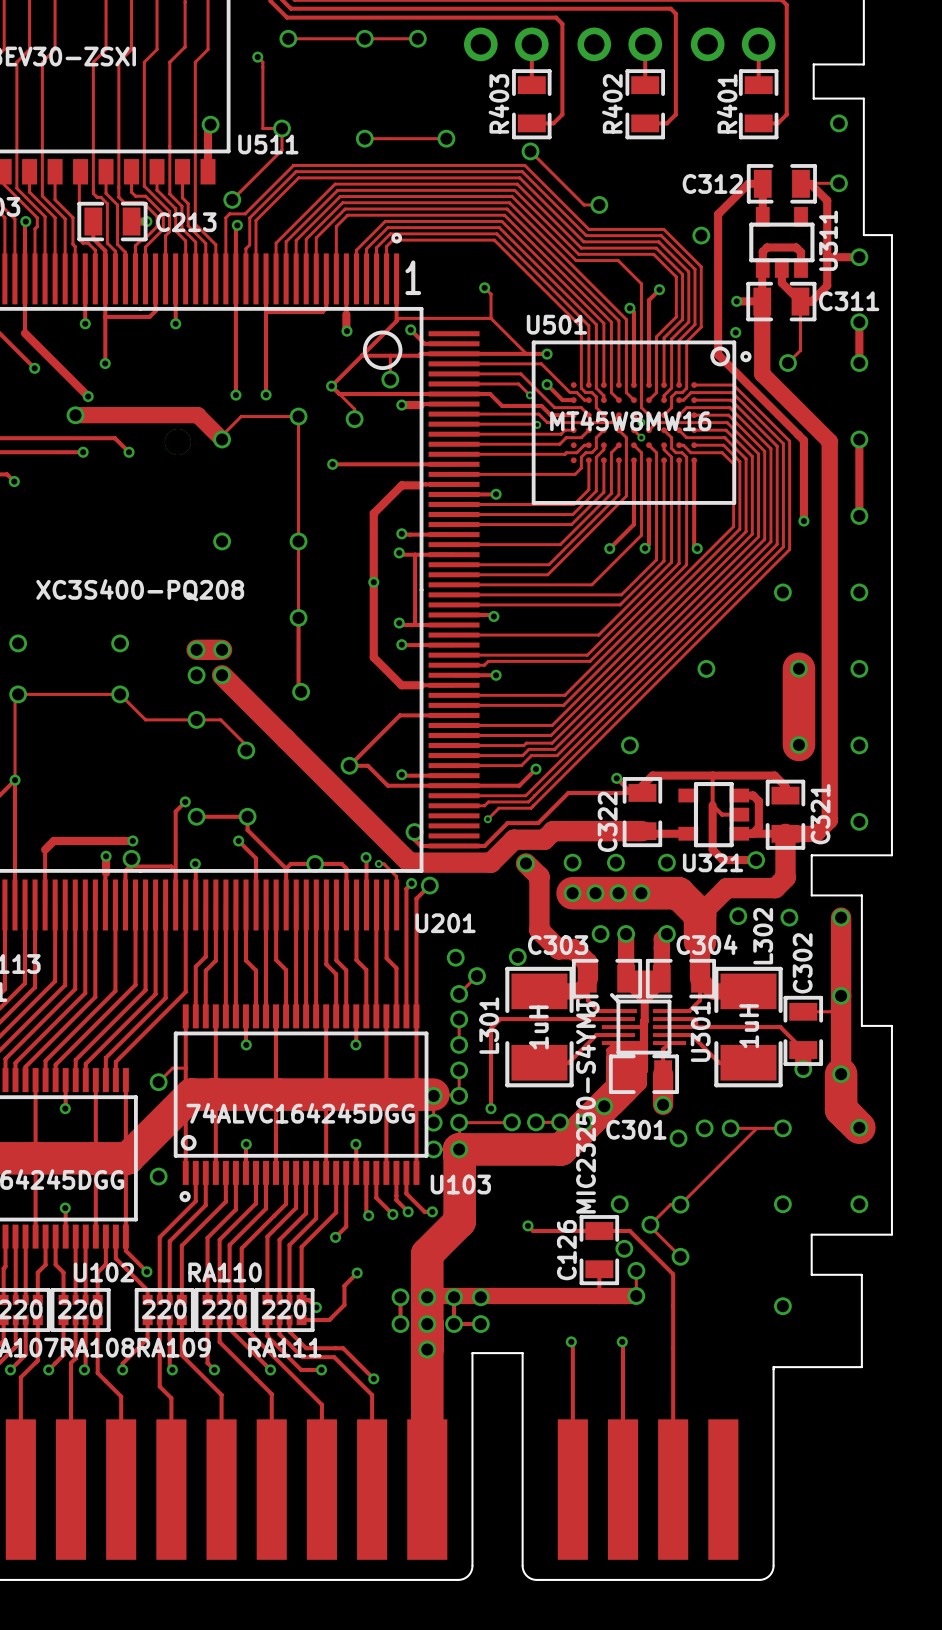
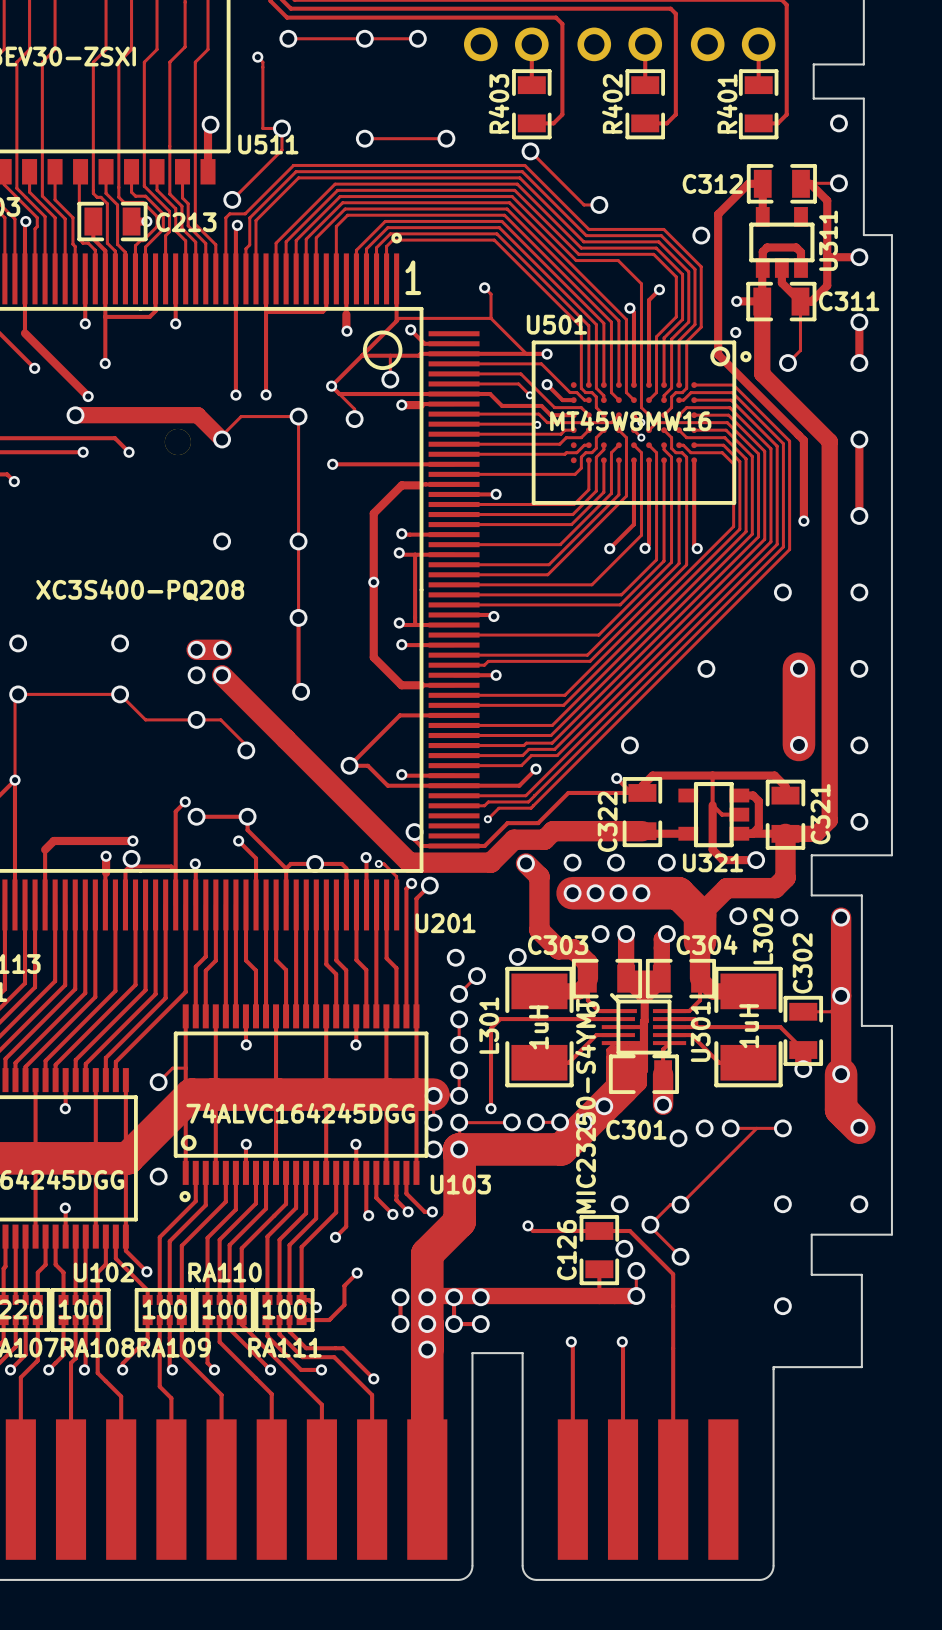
RA108 value: 220 (80, 1309) -> 100 (80, 1309)
RA109 value: 220 (164, 1309) -> 100 (164, 1309)
RA110 value: 220 (224, 1309) -> 100 (224, 1309)
RA111 value: 220 (284, 1309) -> 100 (284, 1309)

